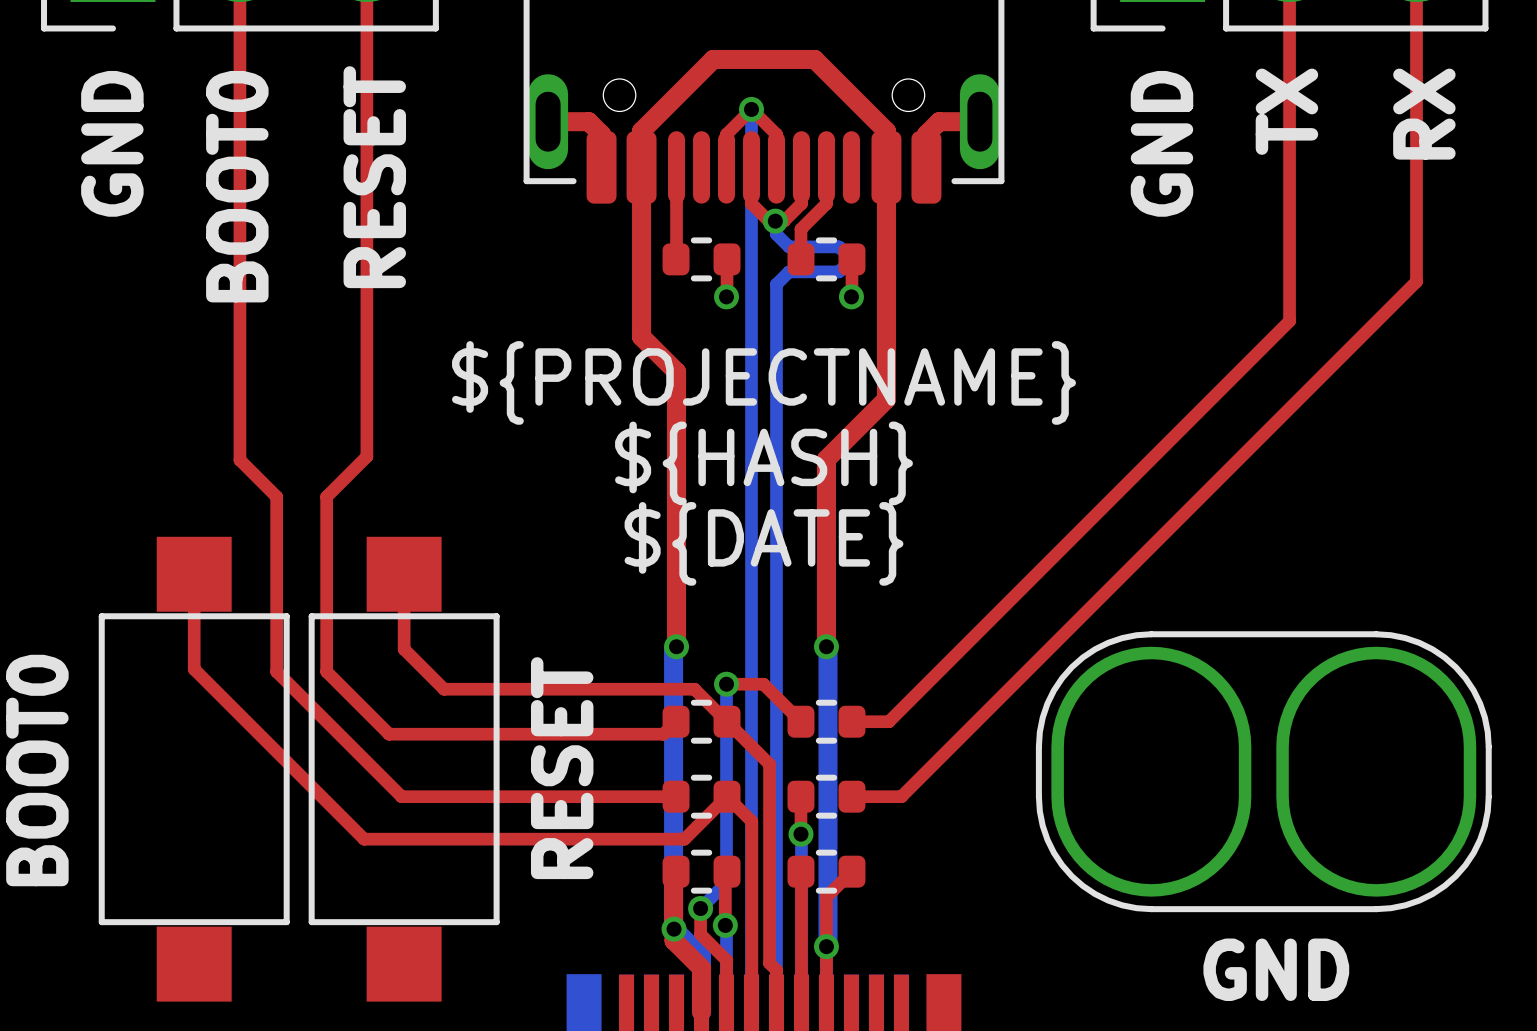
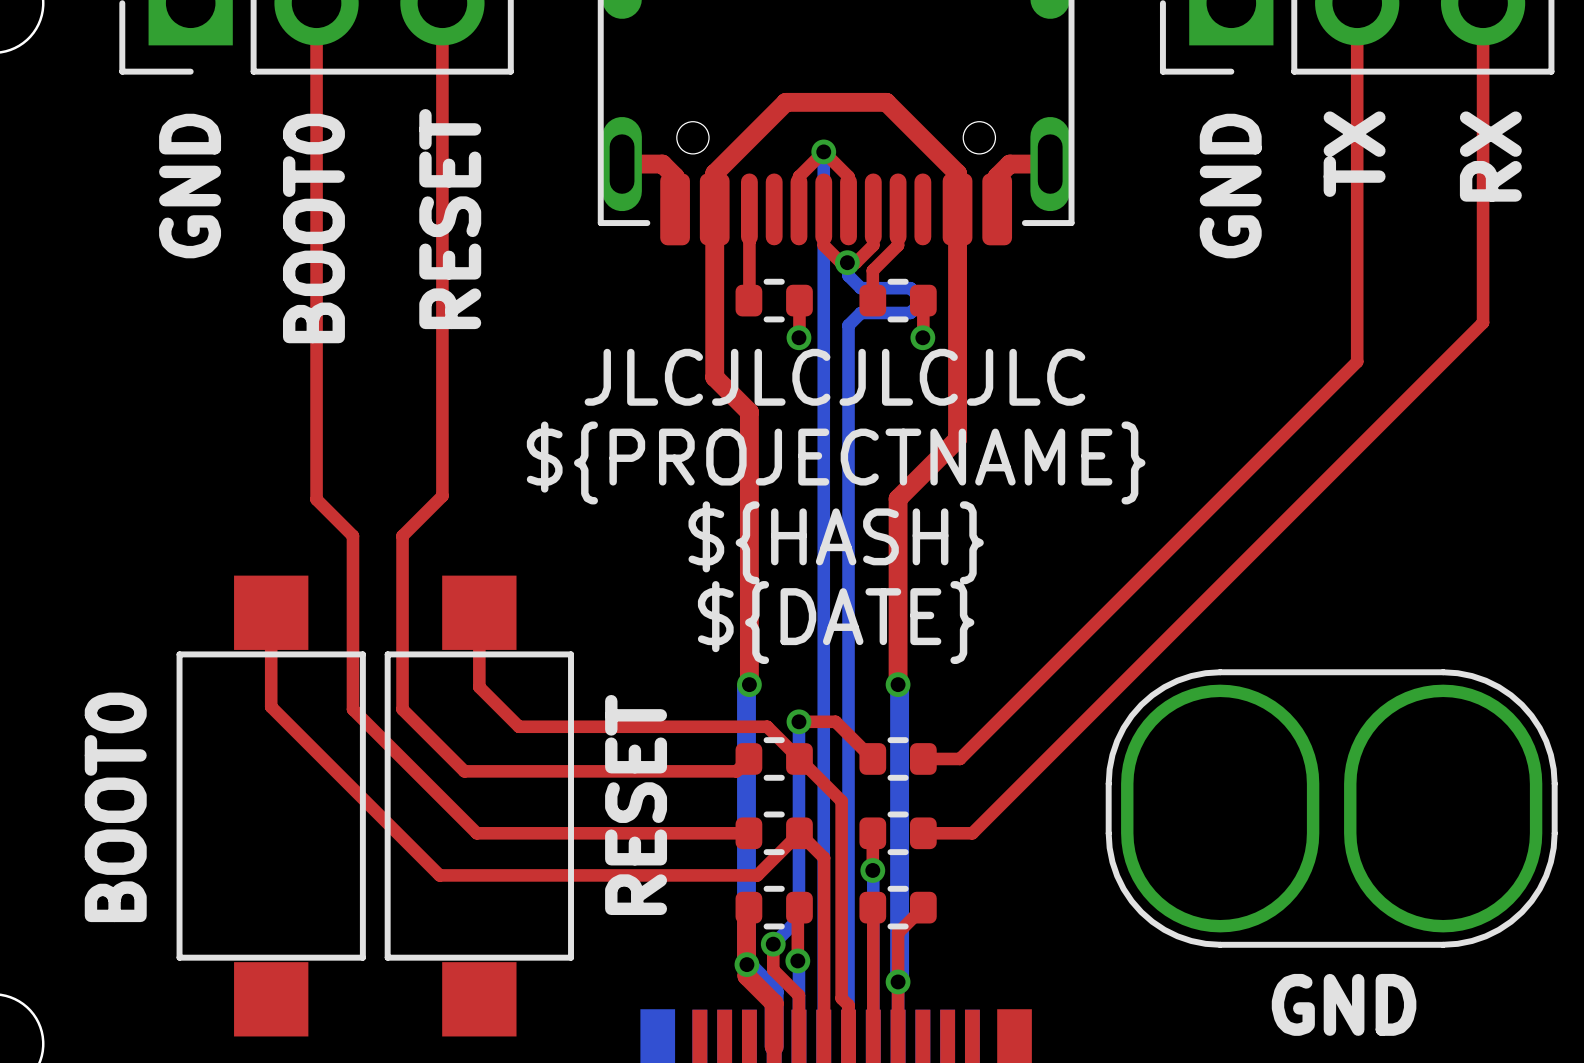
text: none -> JLCJLCJLCJLC (834, 377)
text position: ${PROJECTNAME} (764, 382) -> ${PROJECTNAME} (836, 462)
text position: ${HASH} (764, 463) -> ${HASH} (836, 542)
text position: ${DATE} (764, 543) -> ${DATE} (836, 622)

